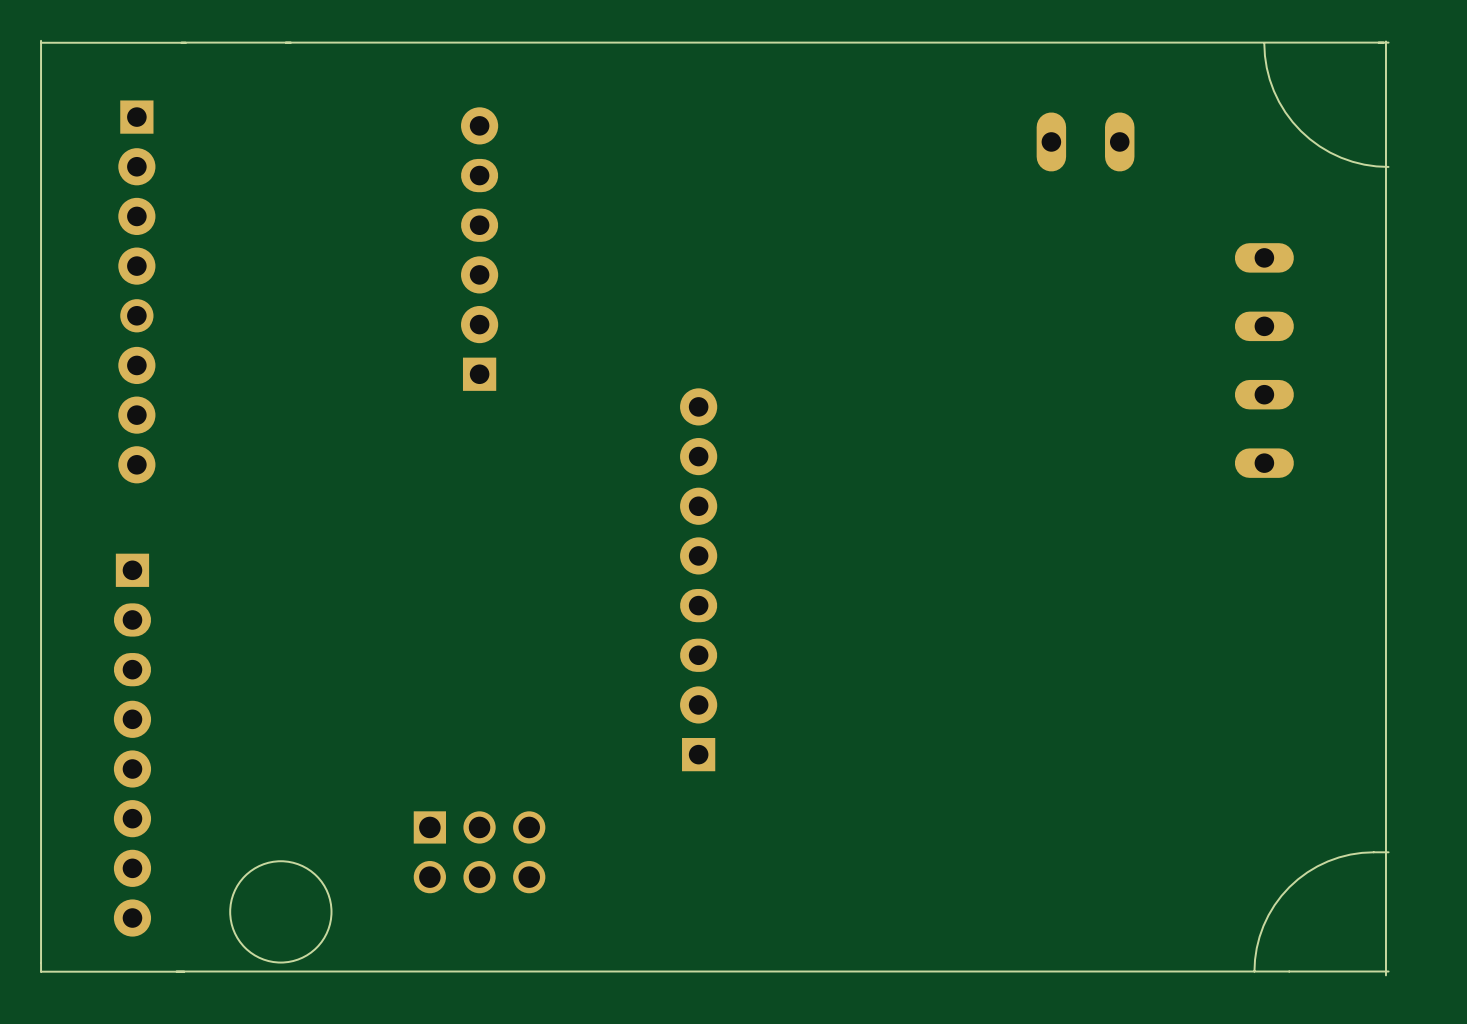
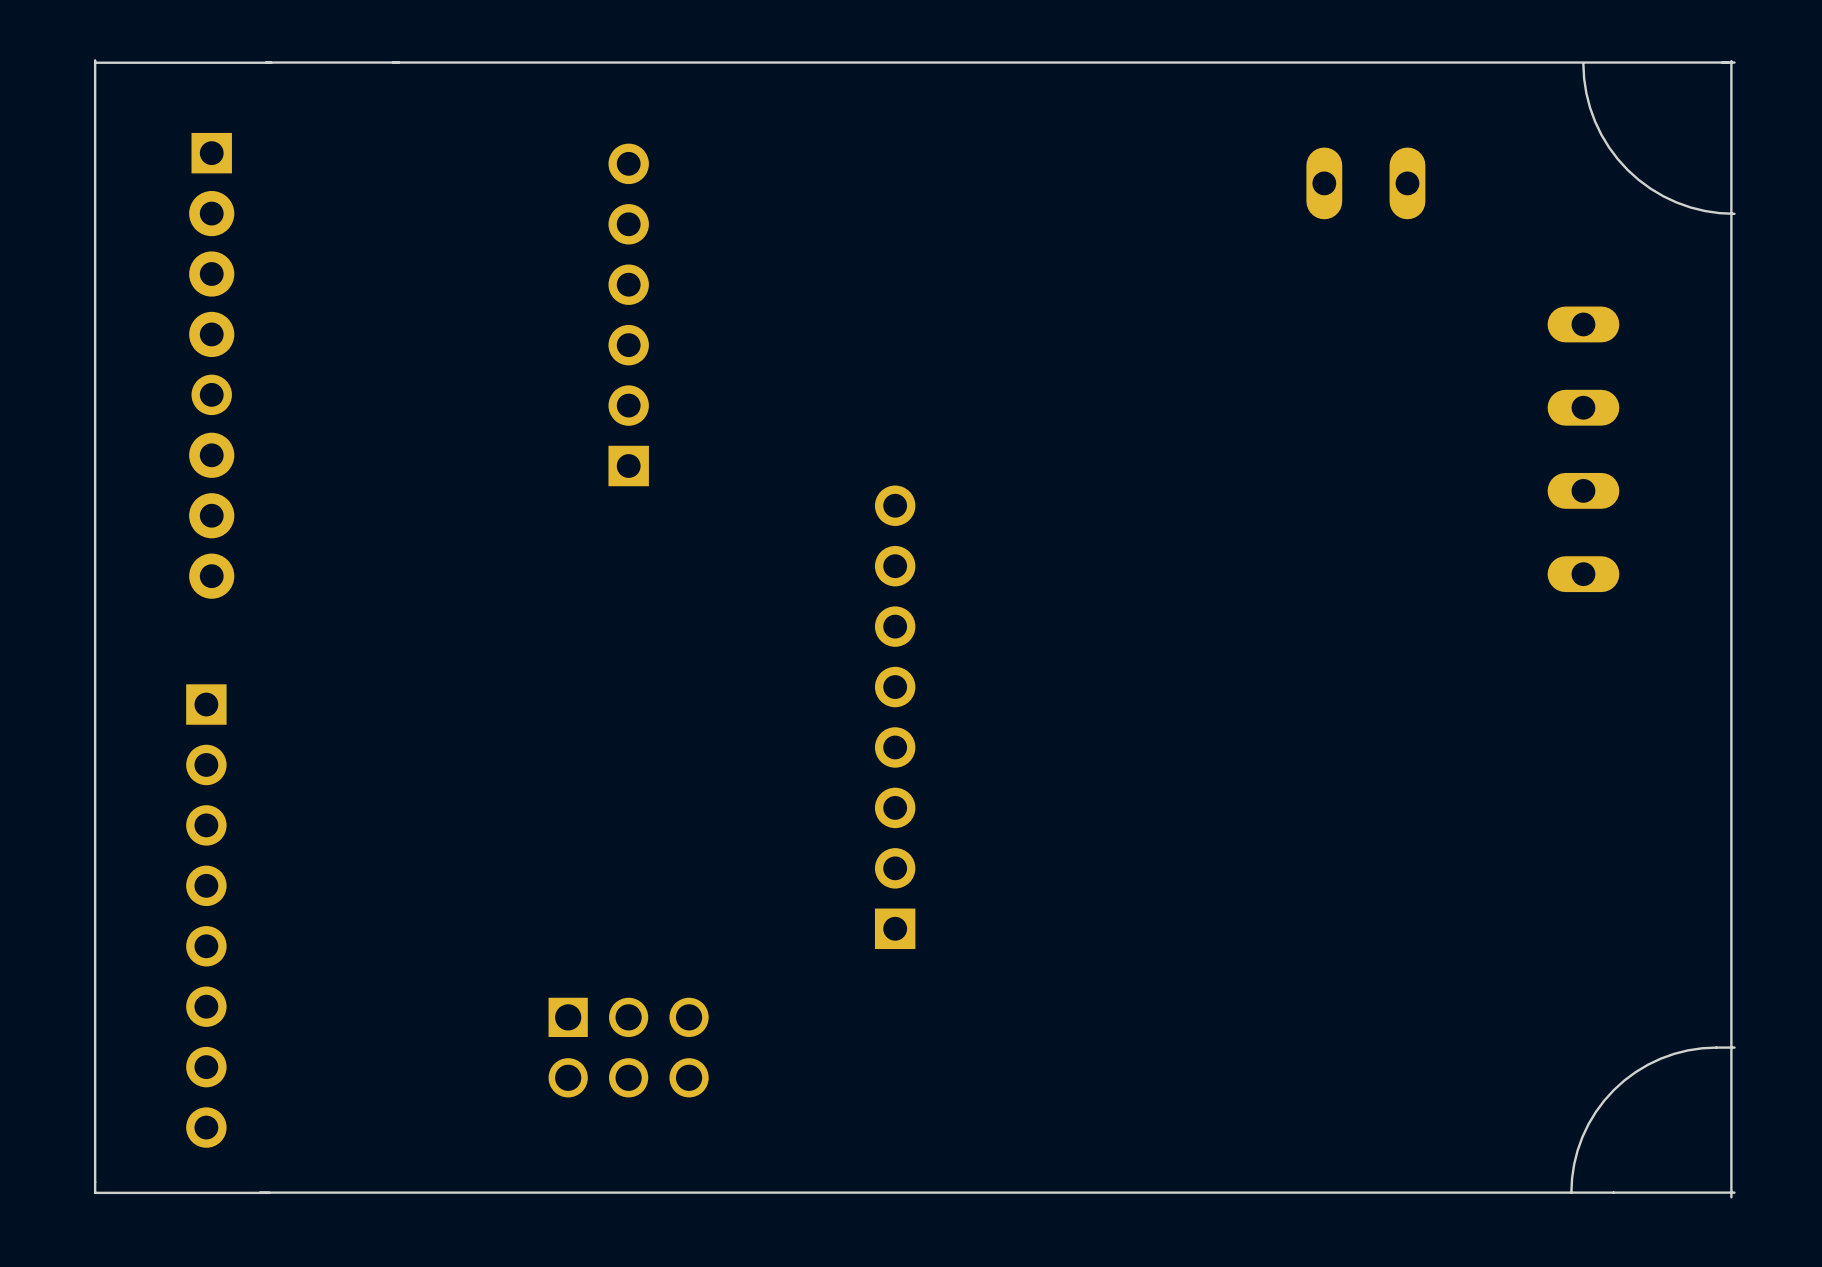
part footprint: [461, 107, 499, 391] -> [608, 143, 649, 487]
part footprint: [680, 388, 718, 772] -> [874, 485, 916, 949]
part footprint: [113, 553, 152, 937] -> [186, 684, 227, 1148]
round board edge: [229, 860, 333, 964] -> none

